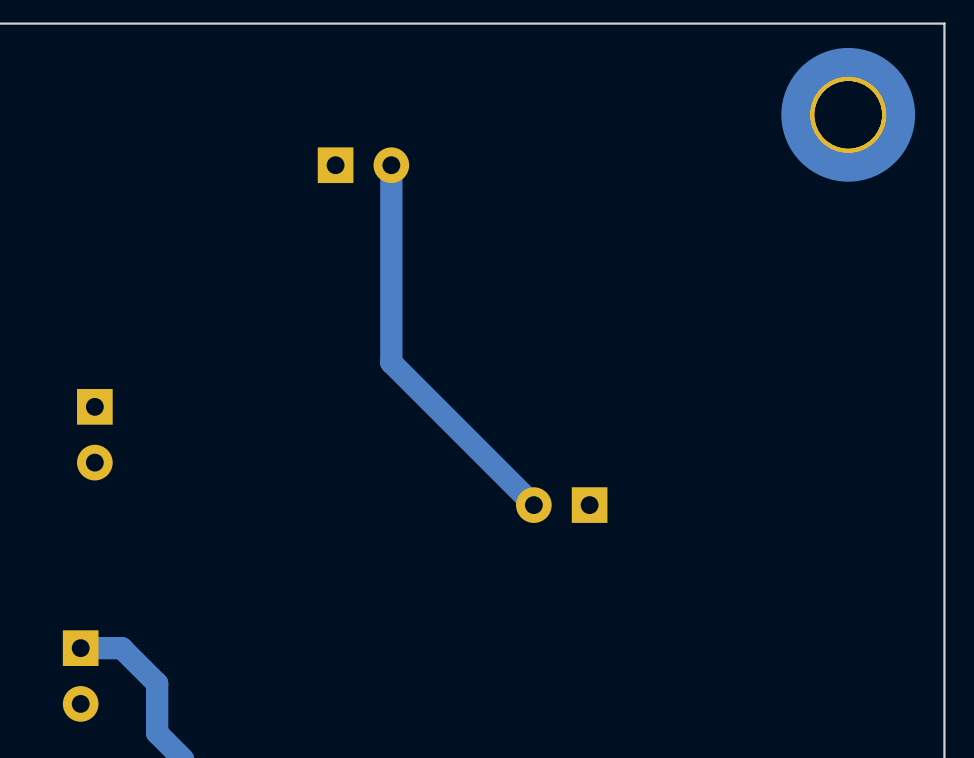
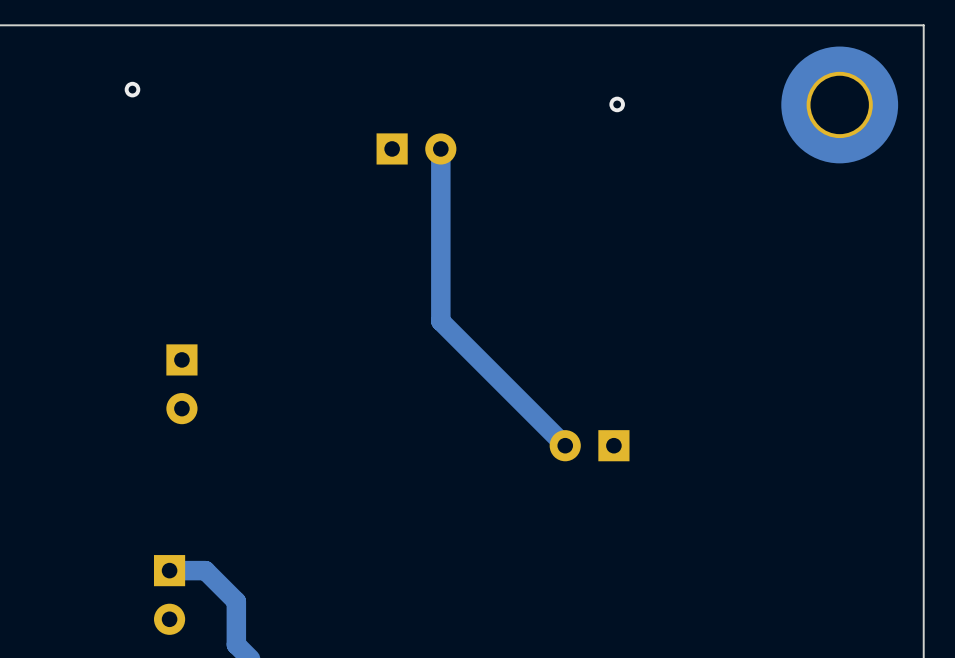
via: none -> (132, 89)
via: none -> (617, 104)
part: (848, 114) -> none

